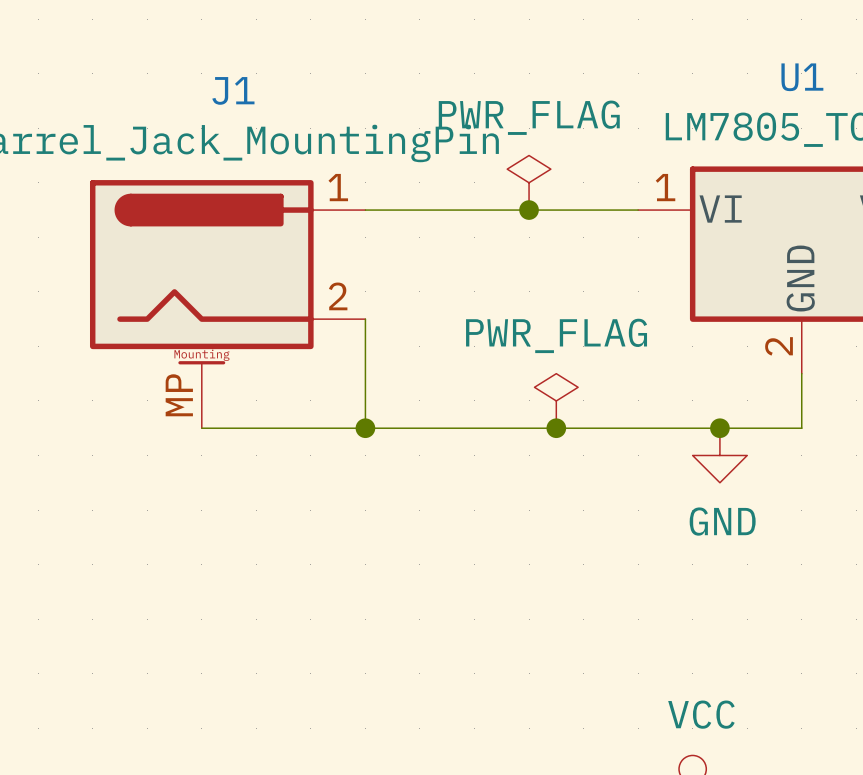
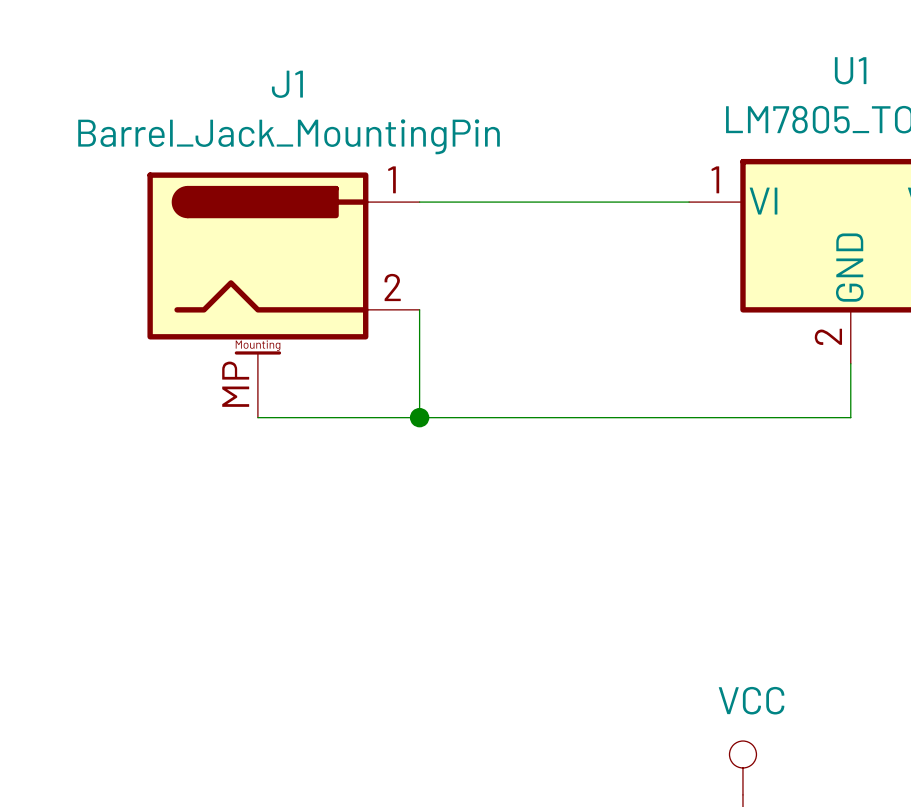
power symbol: PWR_FLAG (529, 182) -> none
junction: (529, 210) -> none
power symbol: PWR_FLAG (556, 400) -> none
junction: (556, 428) -> none
junction: (719, 428) -> none
power symbol: GND (719, 455) -> none

